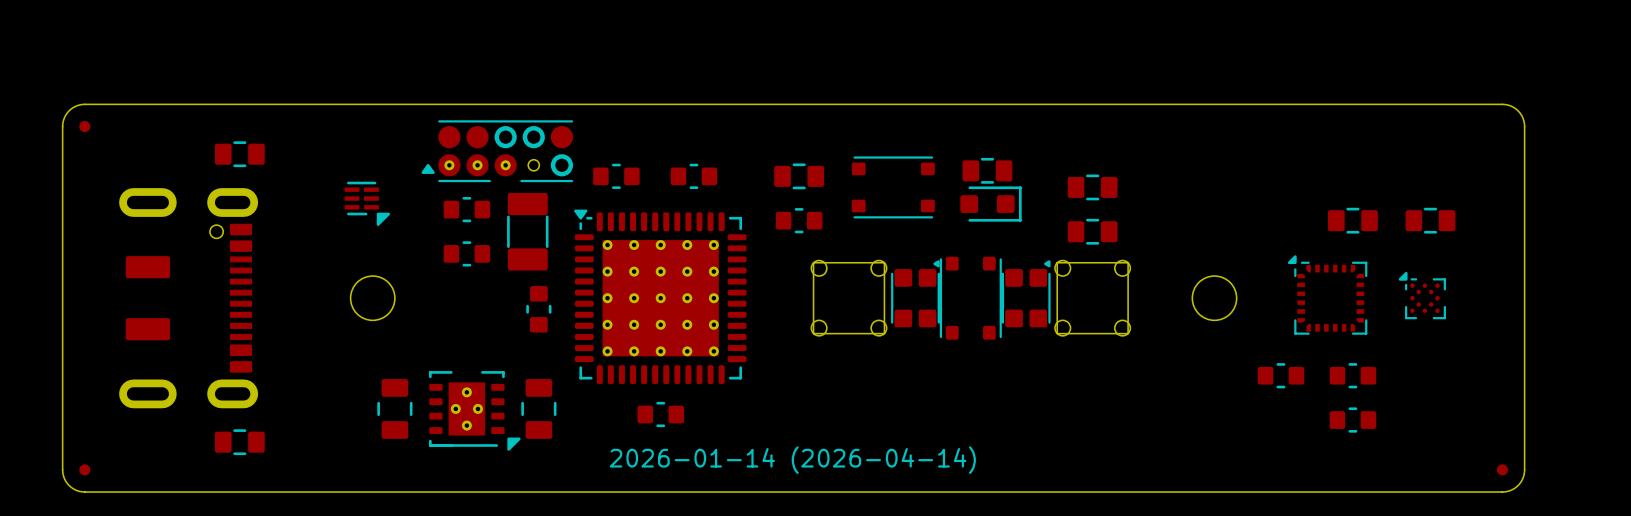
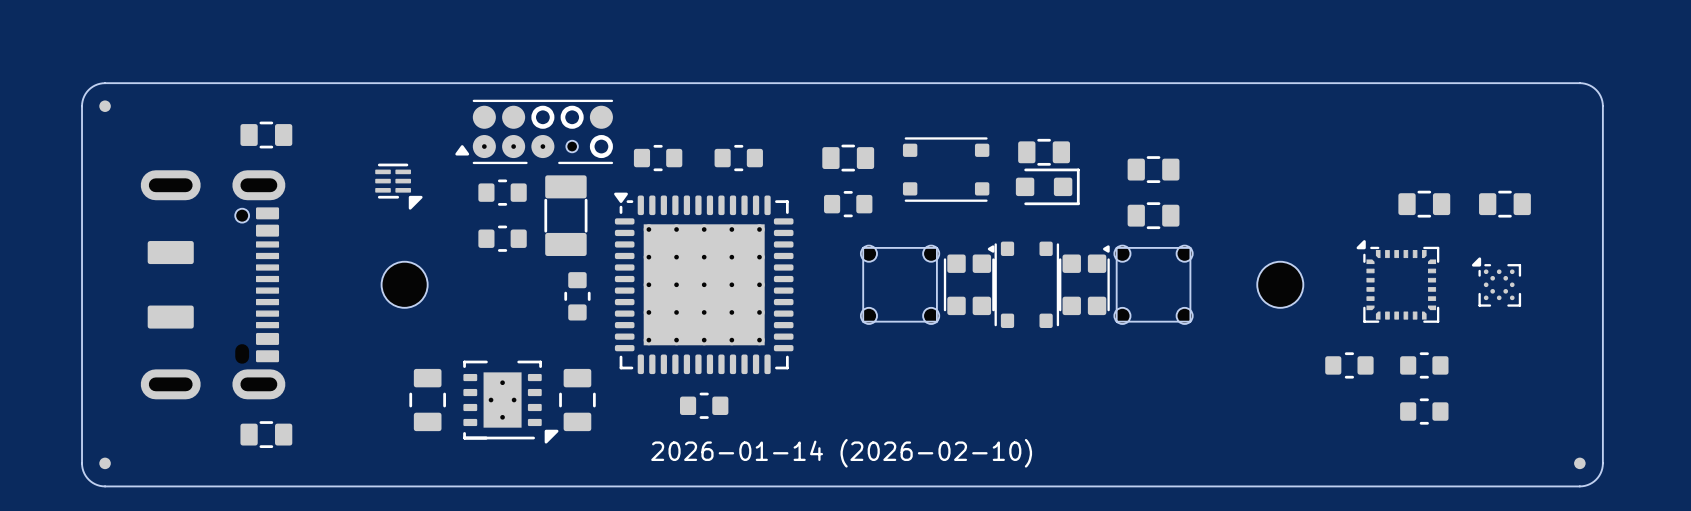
drawing shape: [609, 446, 976, 474] -> [651, 438, 1033, 468]

